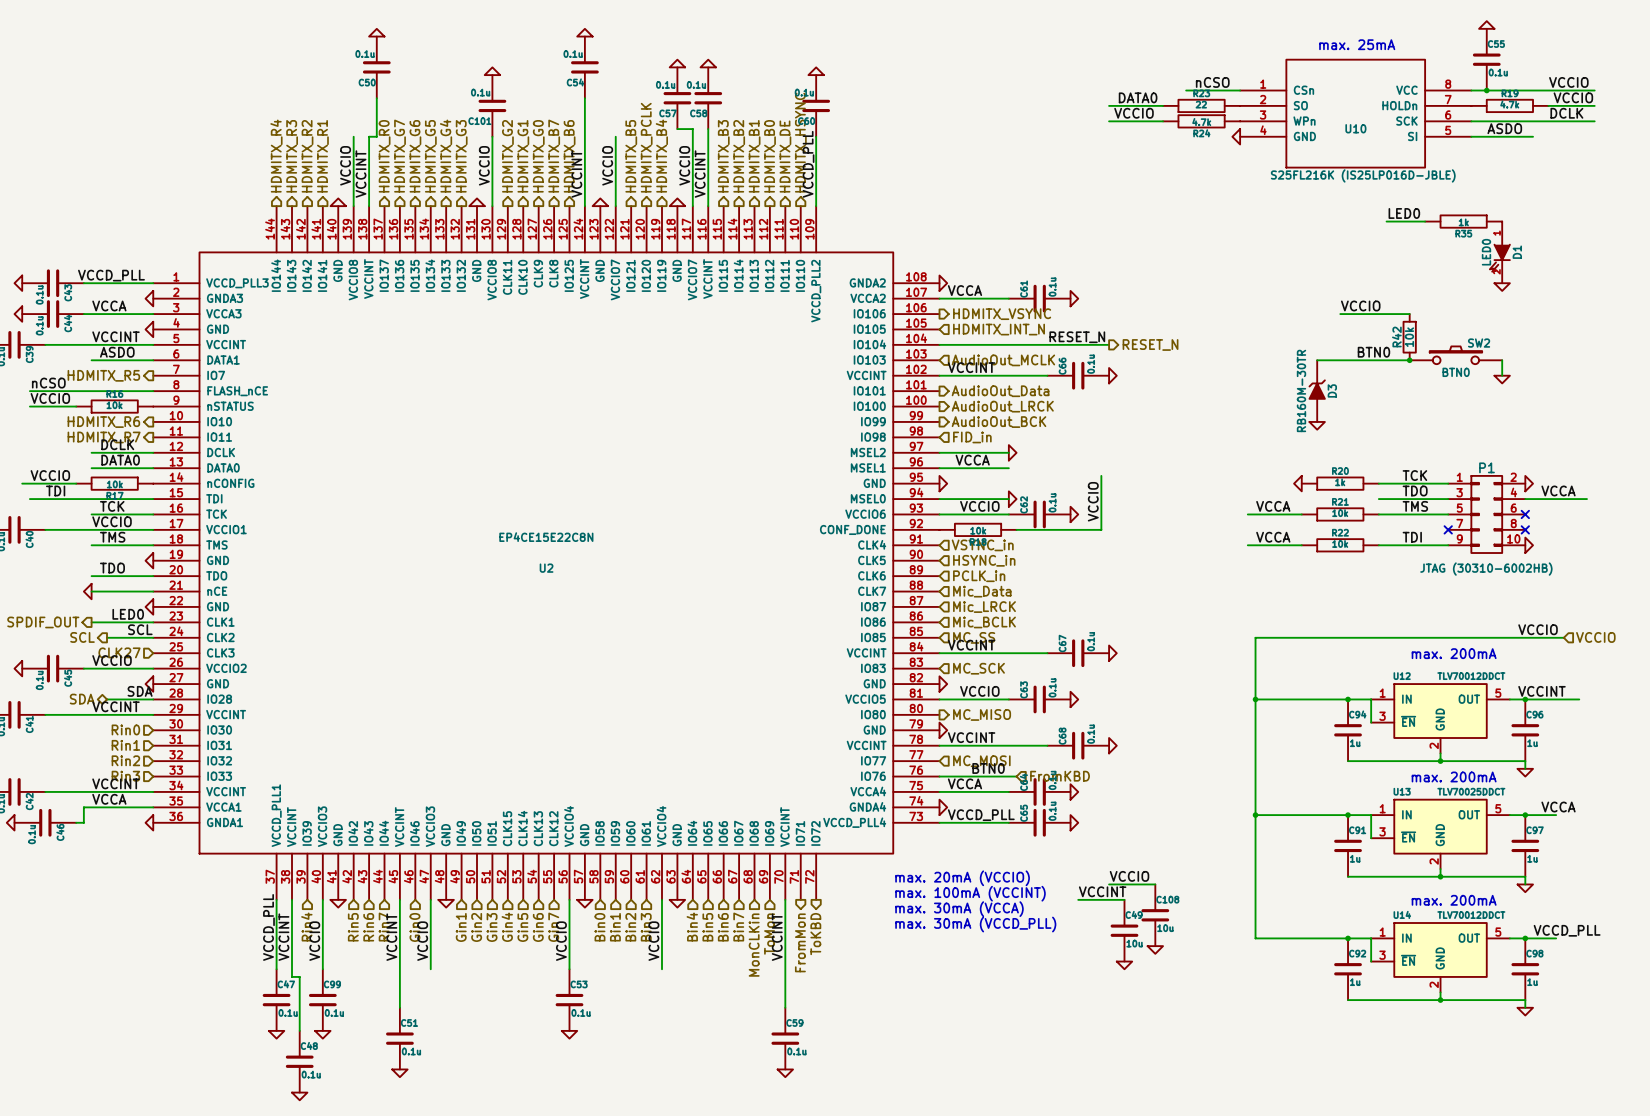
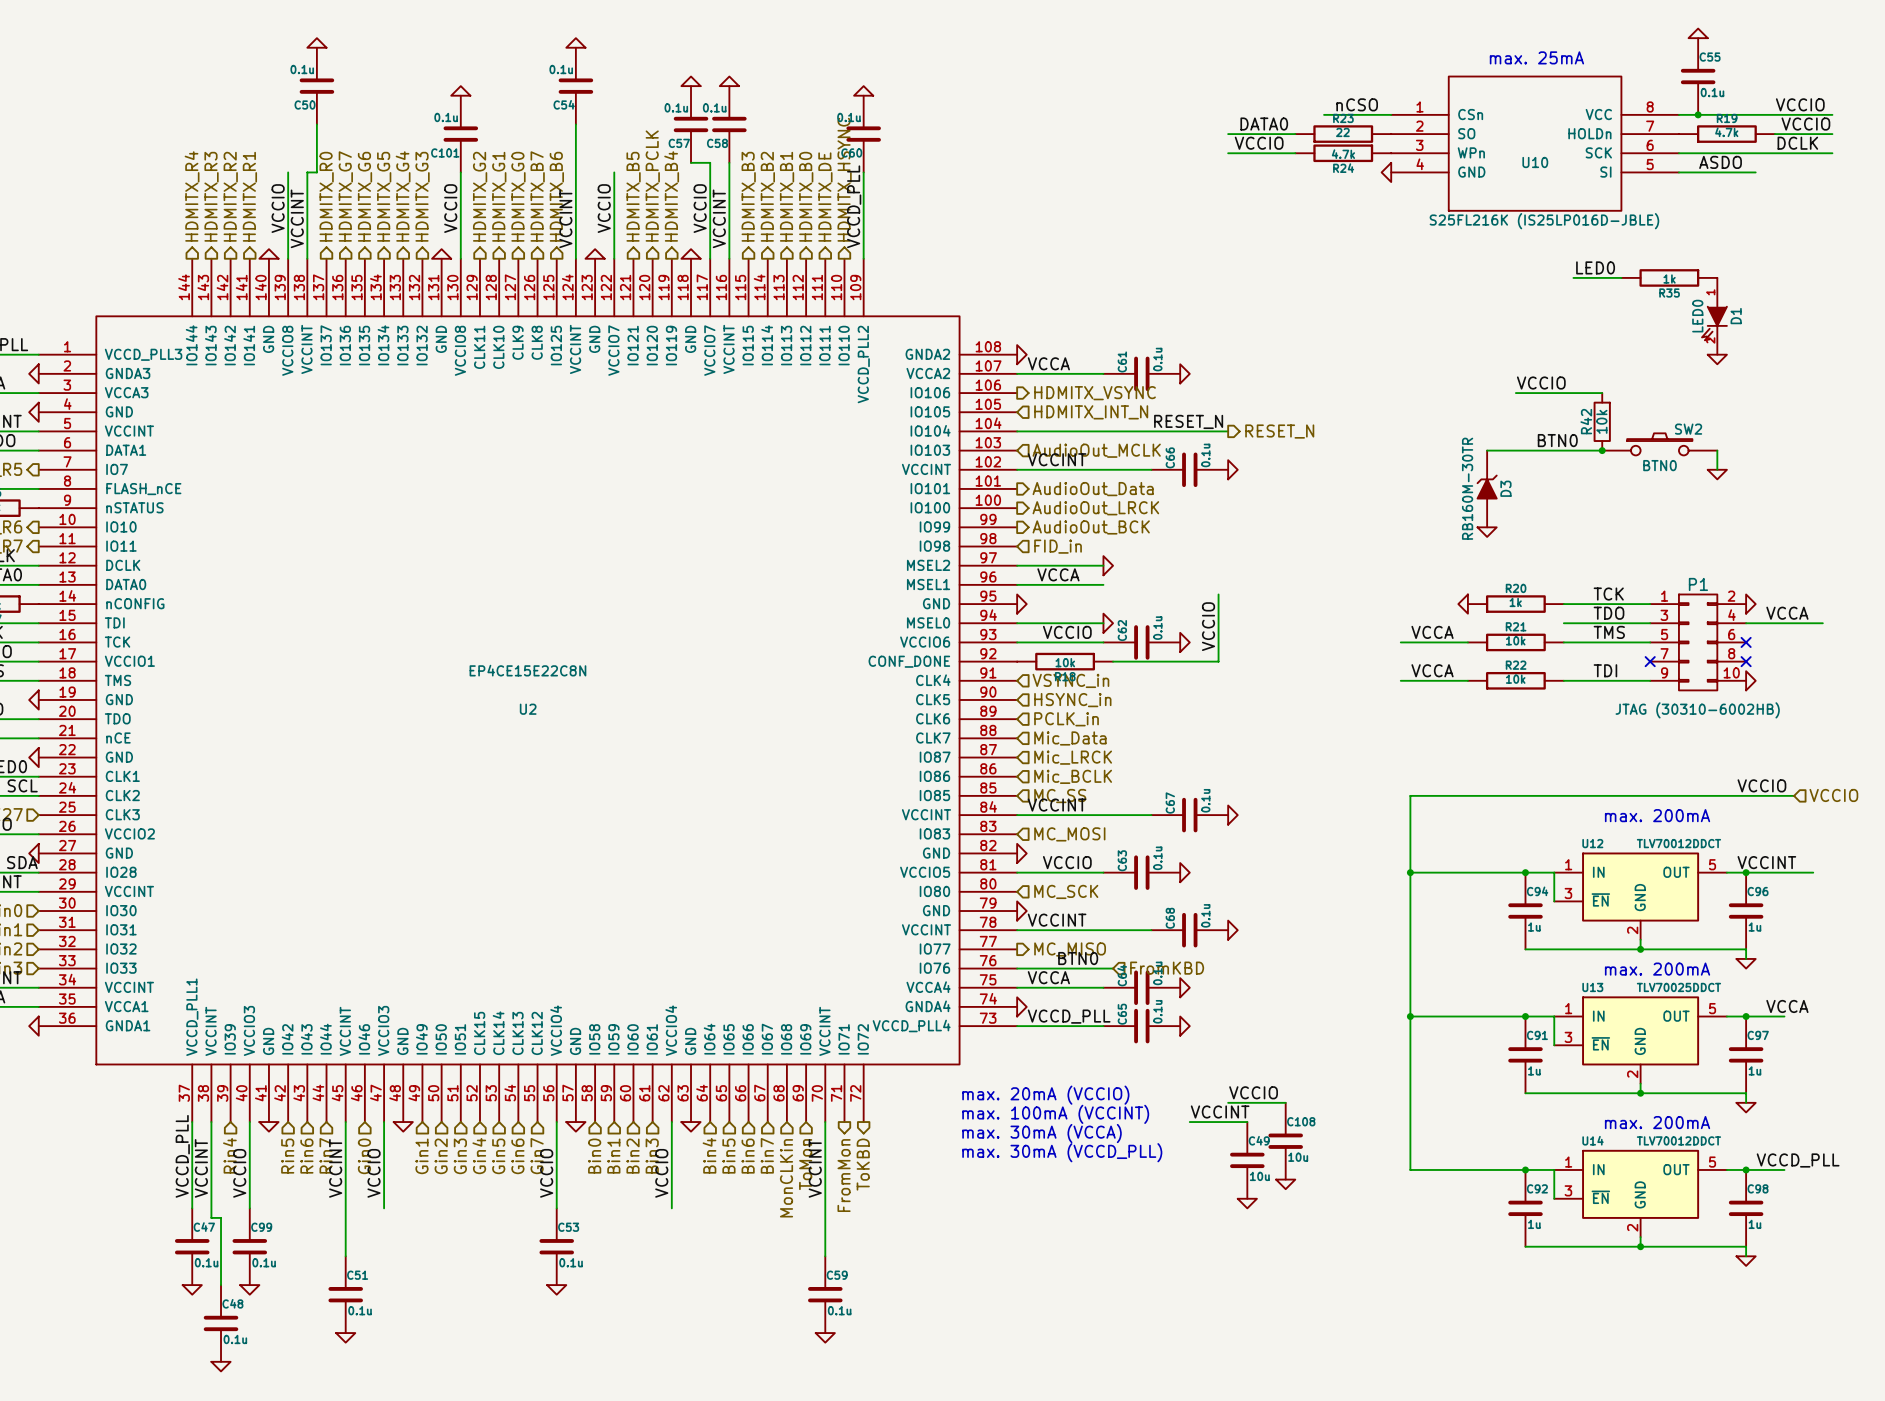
hierarchical label: MC_SCK (978, 668) -> MC_MOSI (1069, 834)
hierarchical label shape: output (982, 714) -> input (1066, 891)
hierarchical label: MC_MISO (982, 714) -> MC_SCK (1066, 891)
hierarchical label shape: input (981, 761) -> output (1070, 949)
hierarchical label: MC_MOSI (981, 761) -> MC_MISO (1070, 949)

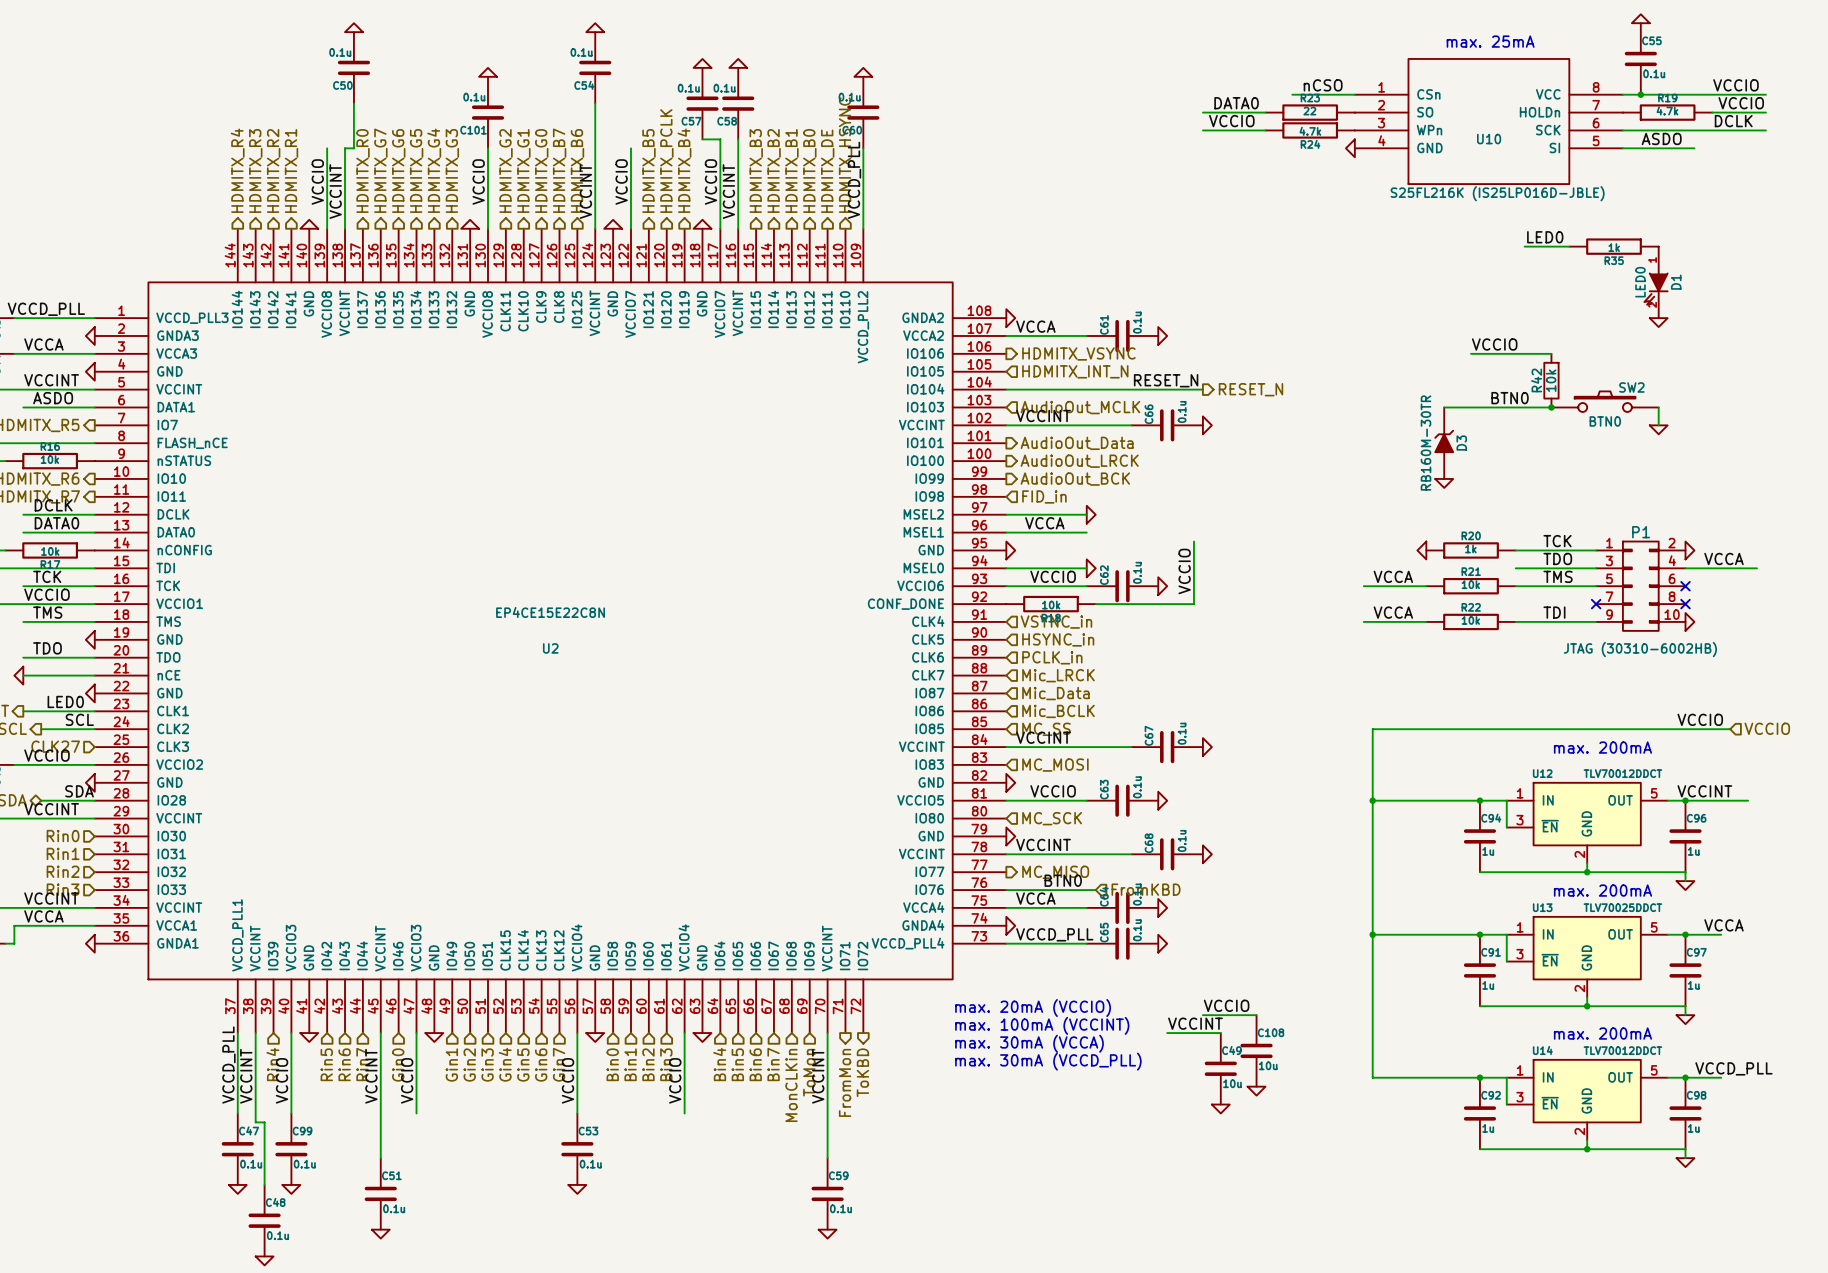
hierarchical label: Mic_Data (1070, 738) -> Mic_LRCK (1058, 675)
hierarchical label: Mic_LRCK (1073, 757) -> Mic_Data (1055, 693)

